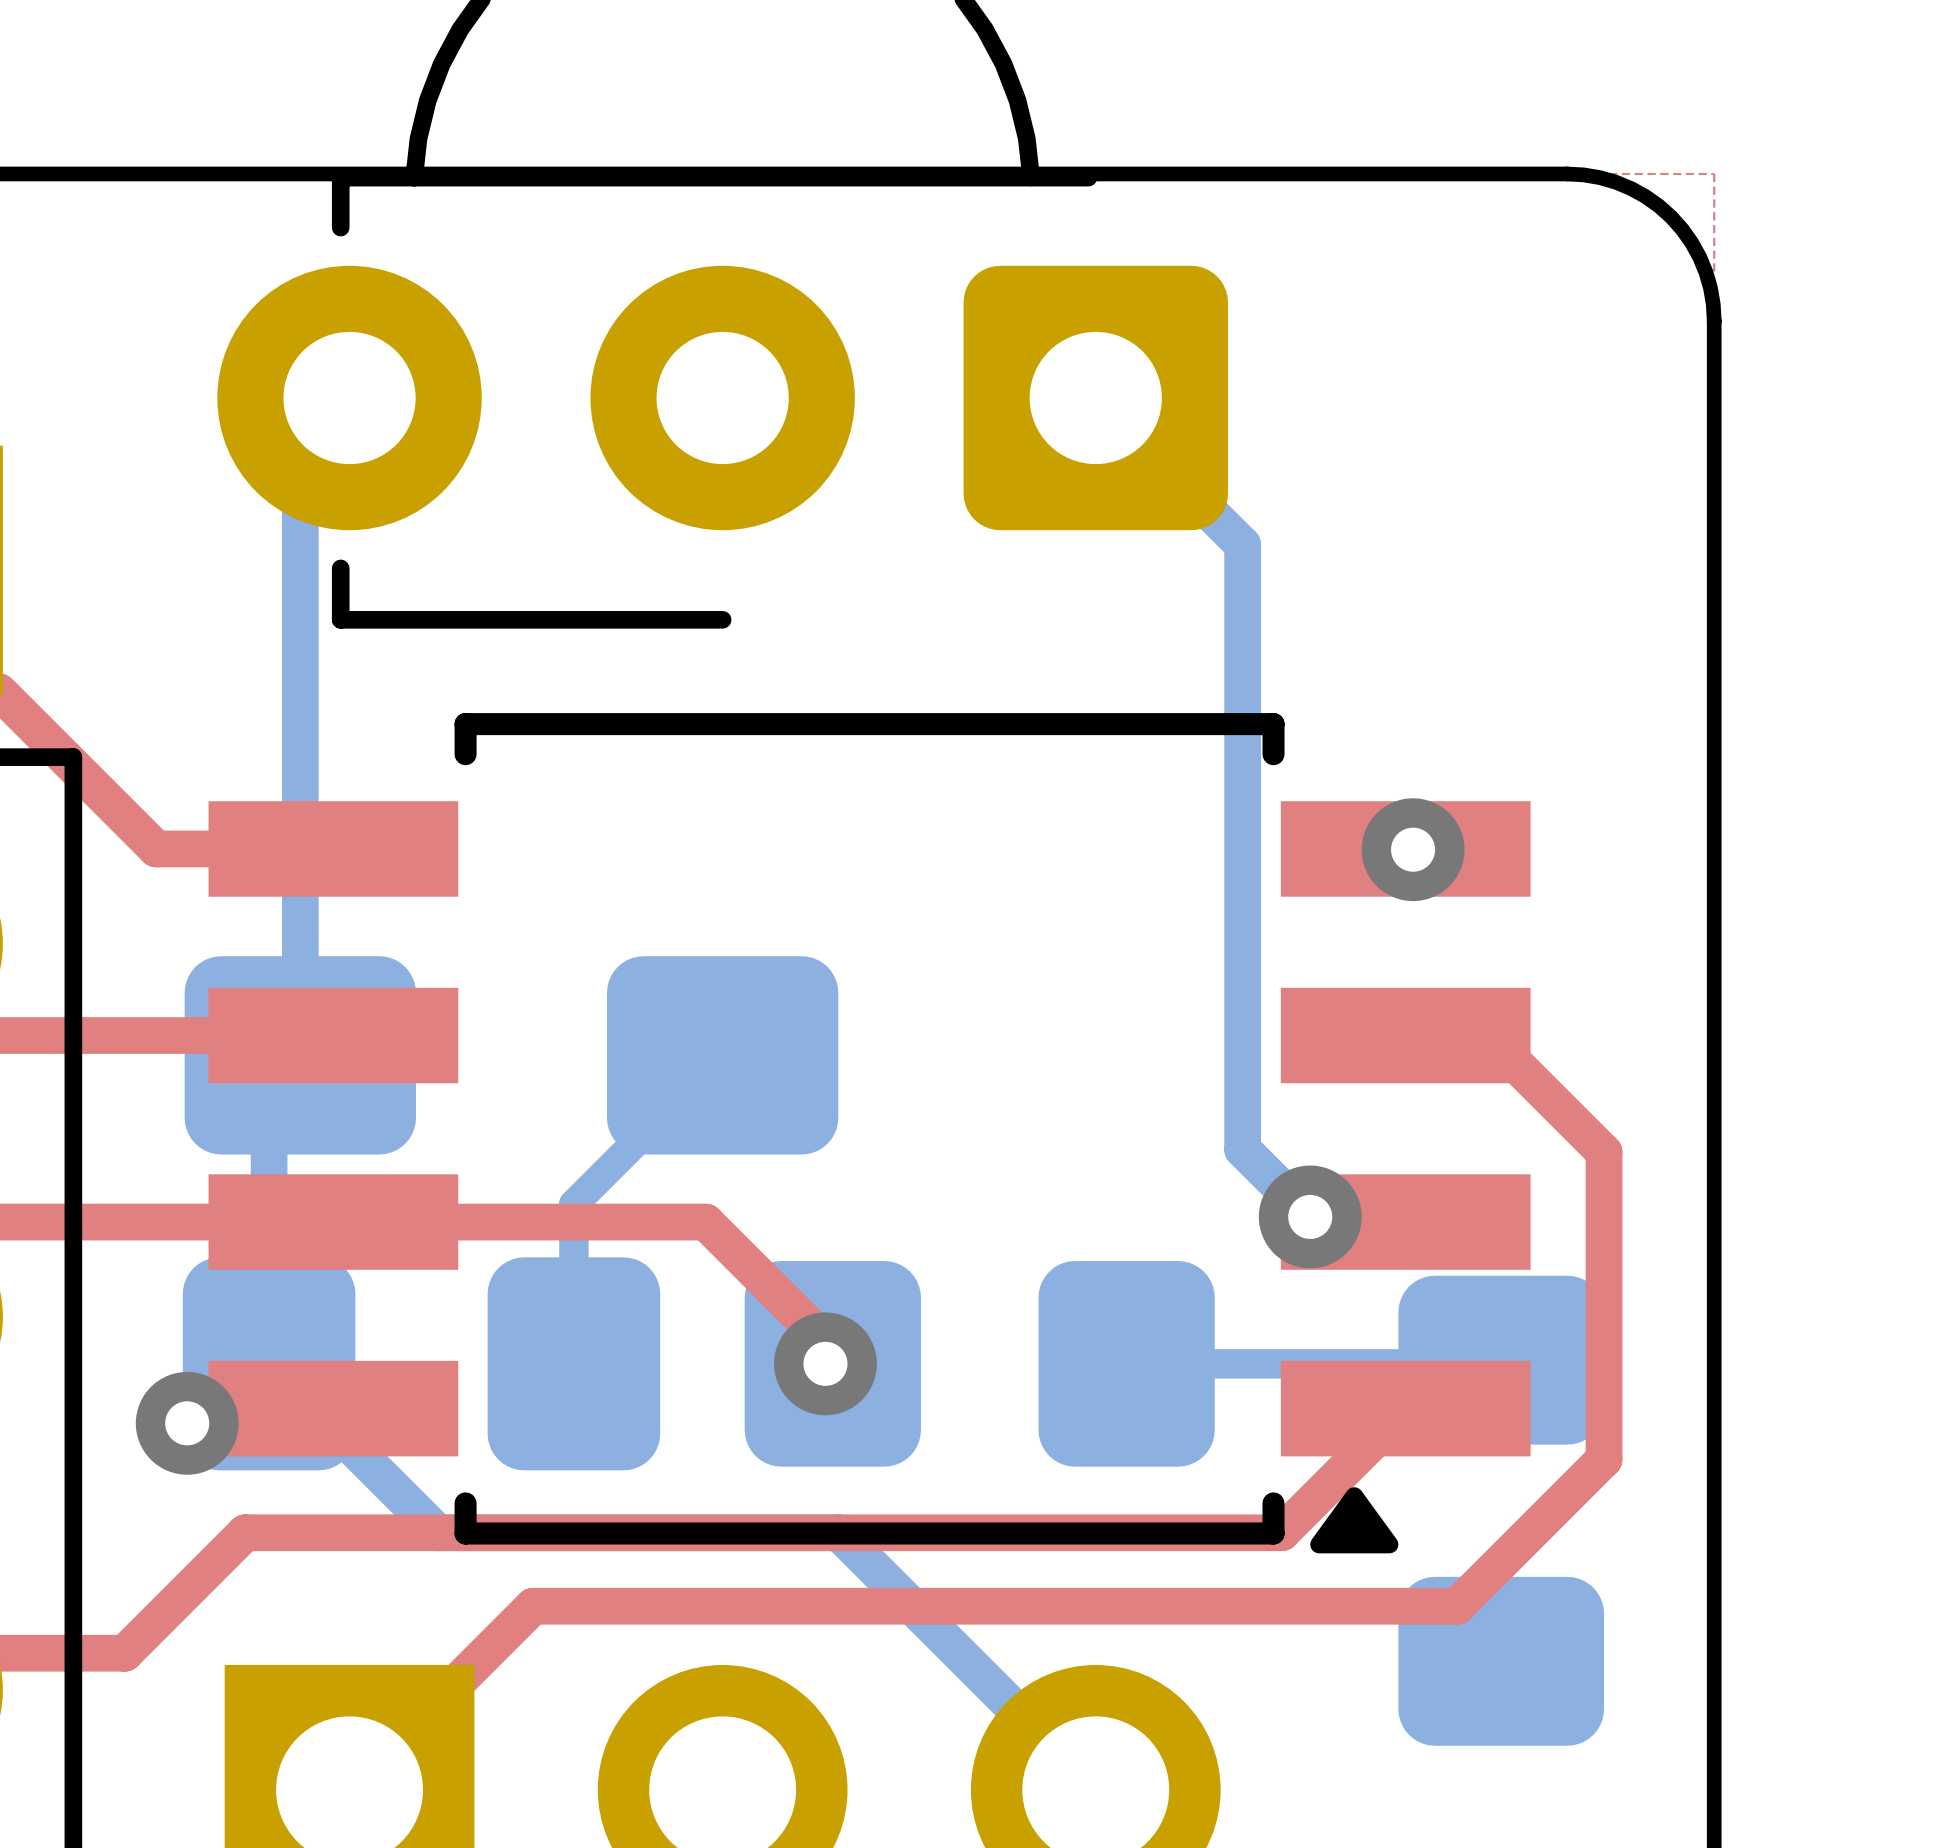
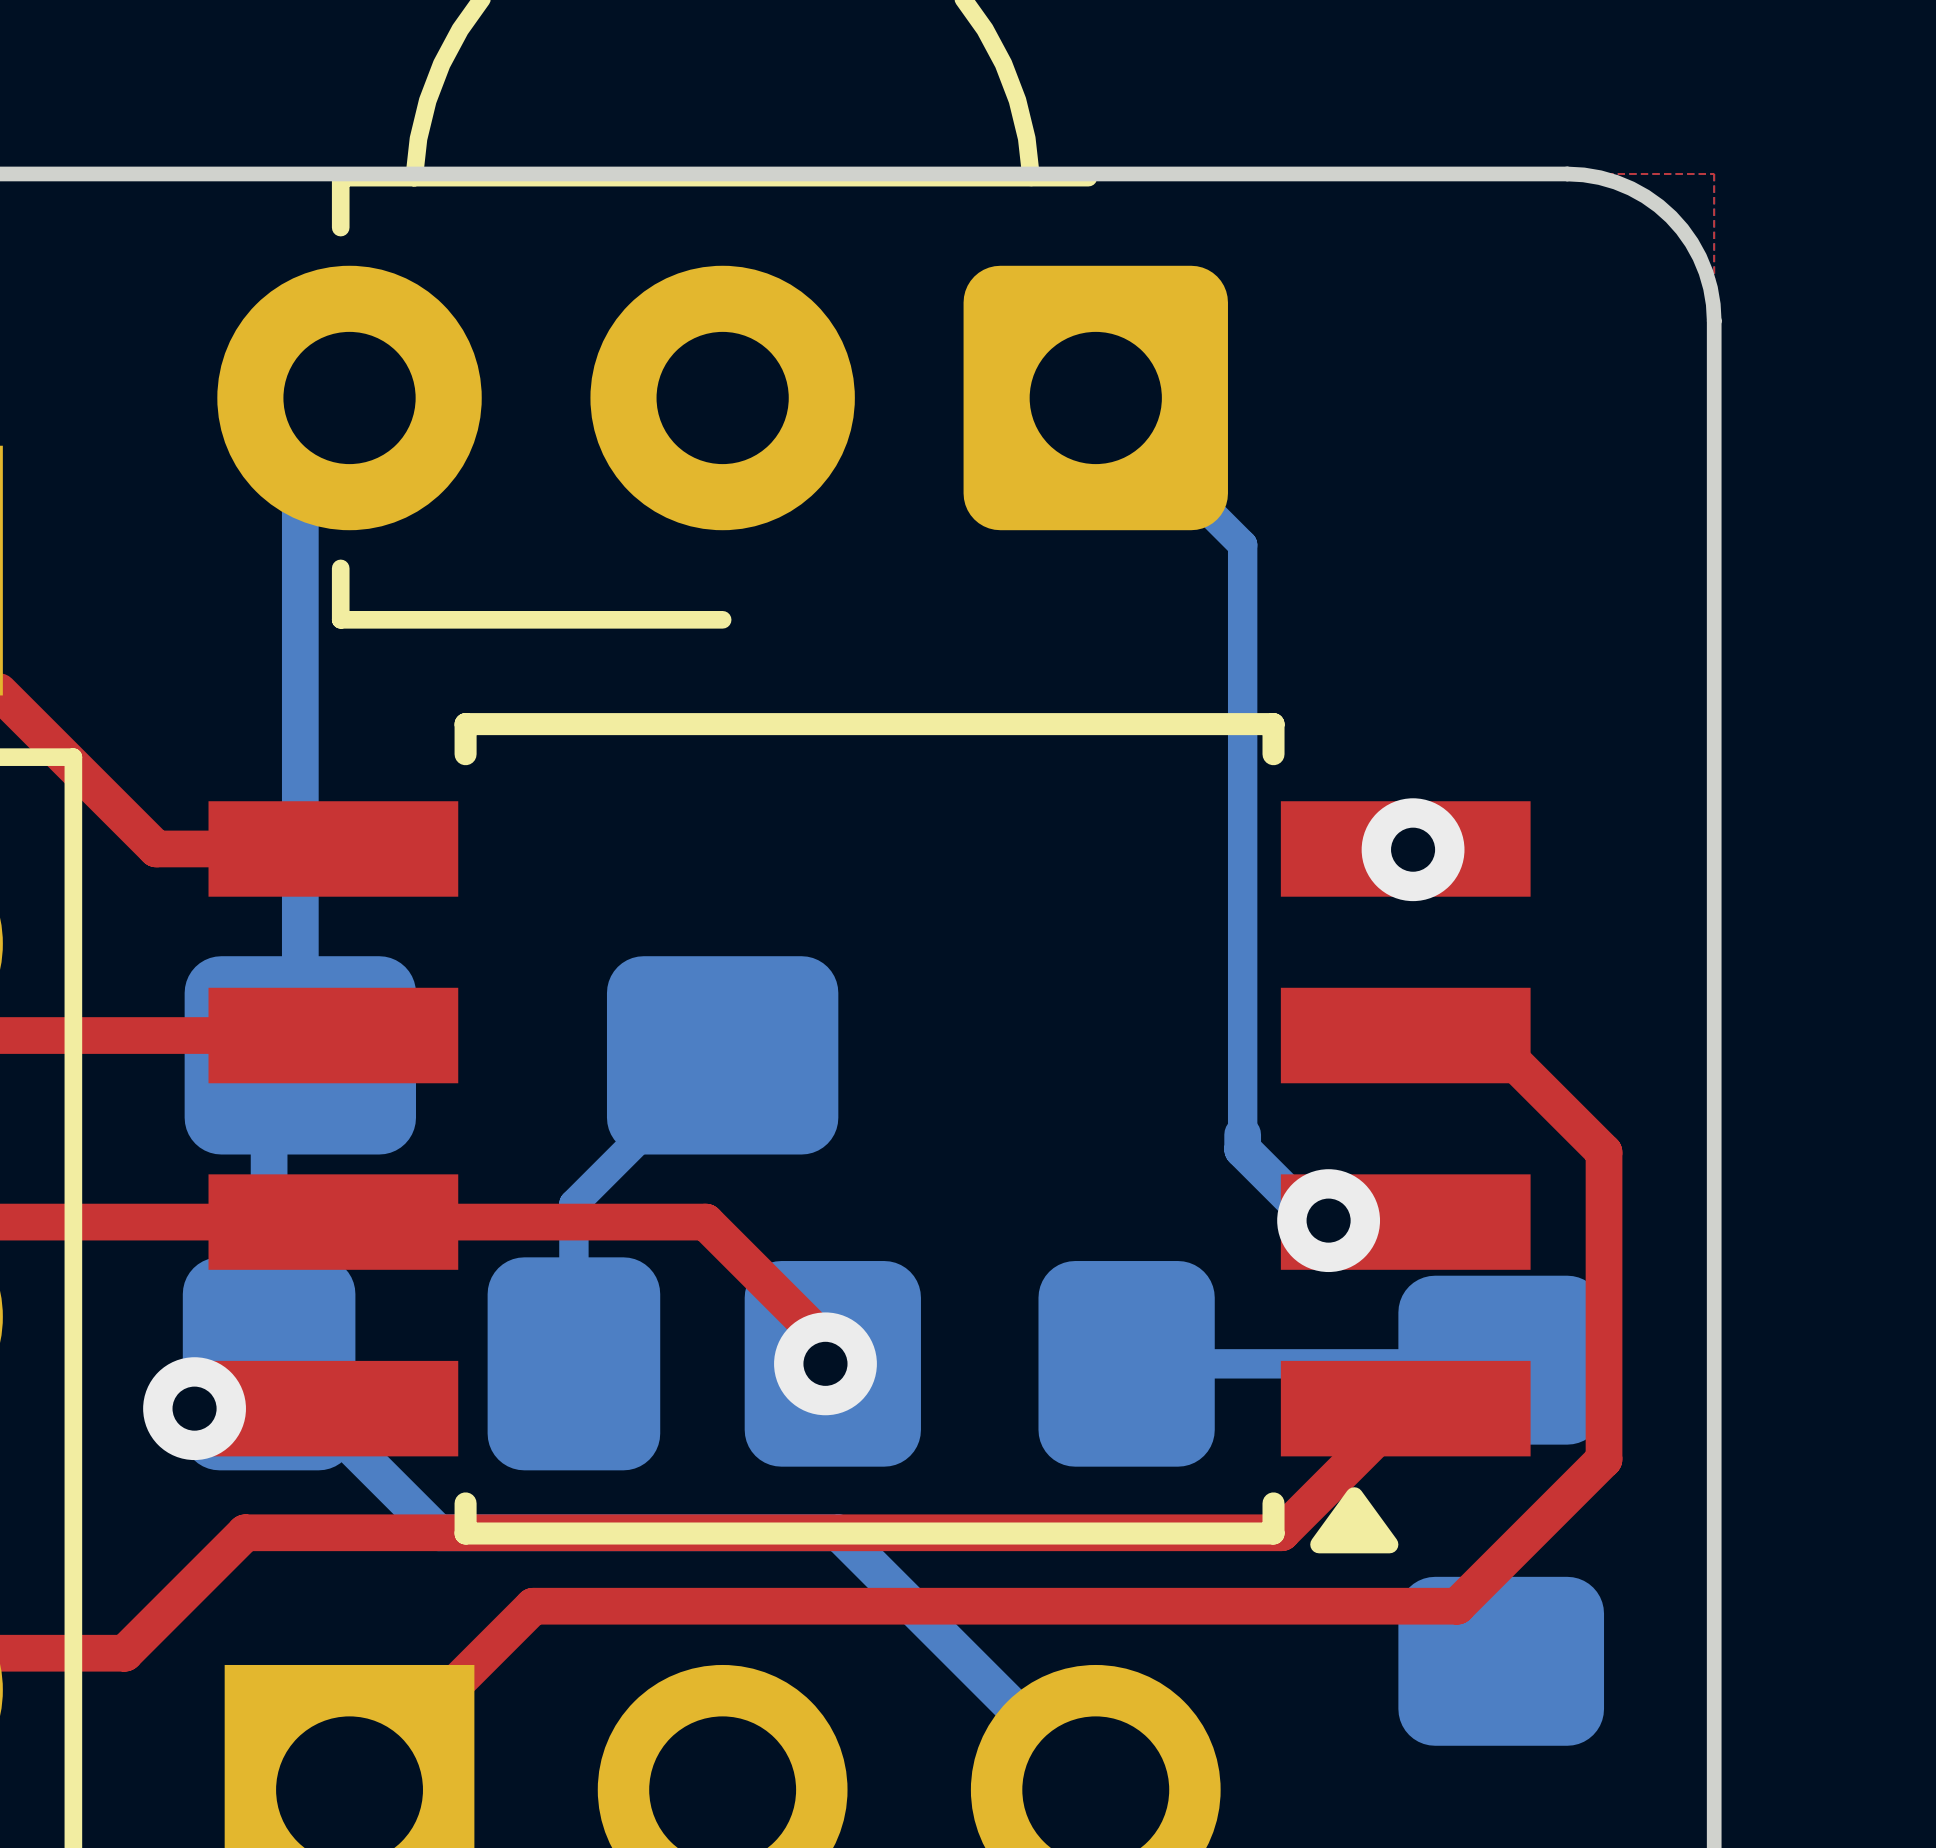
bottom track width: thick (1095, 397) (1242, 544) (1242, 1134) -> thin (1095, 397) (1242, 544) (1242, 1134)
via position: (1310, 1216) -> (1328, 1220)
via position: (187, 1423) -> (194, 1408)

